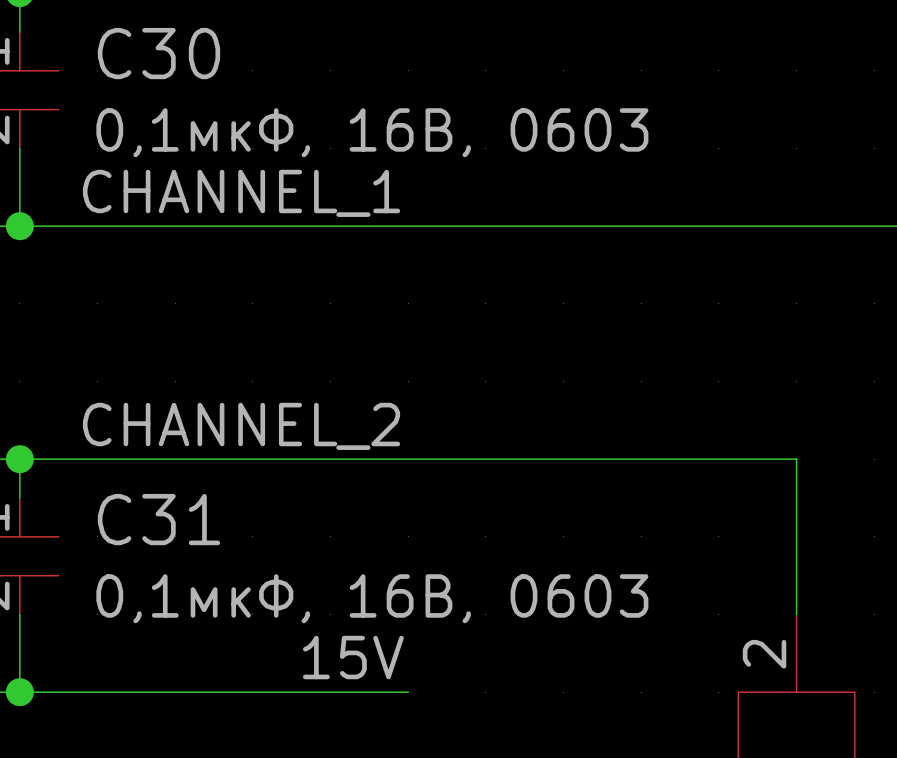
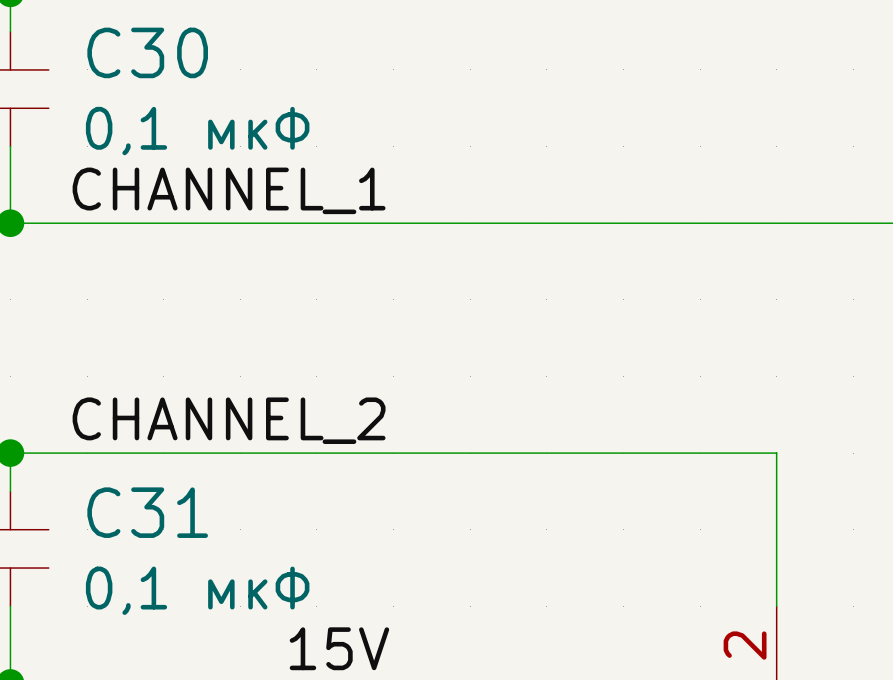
C30 text: 0,1мкФ, 16В, 0603 (372, 132) -> 0,1 мкФ (197, 131)
C31 text: 0,1мкФ, 16В, 0603 (372, 598) -> 0,1 мкФ (197, 590)

